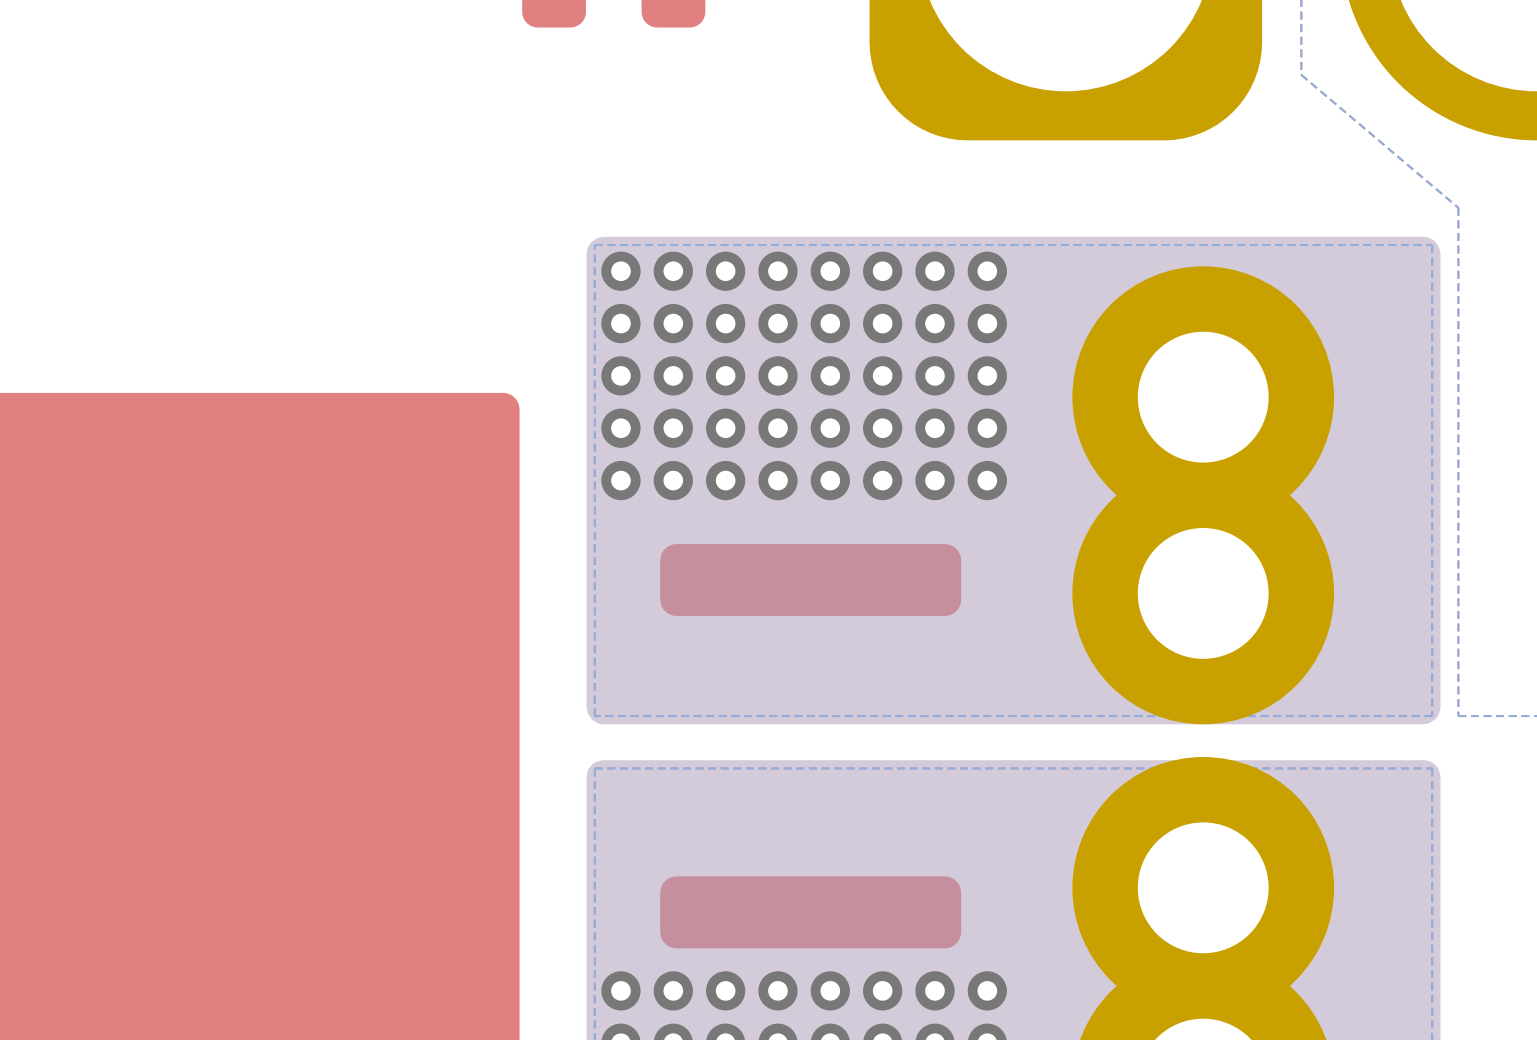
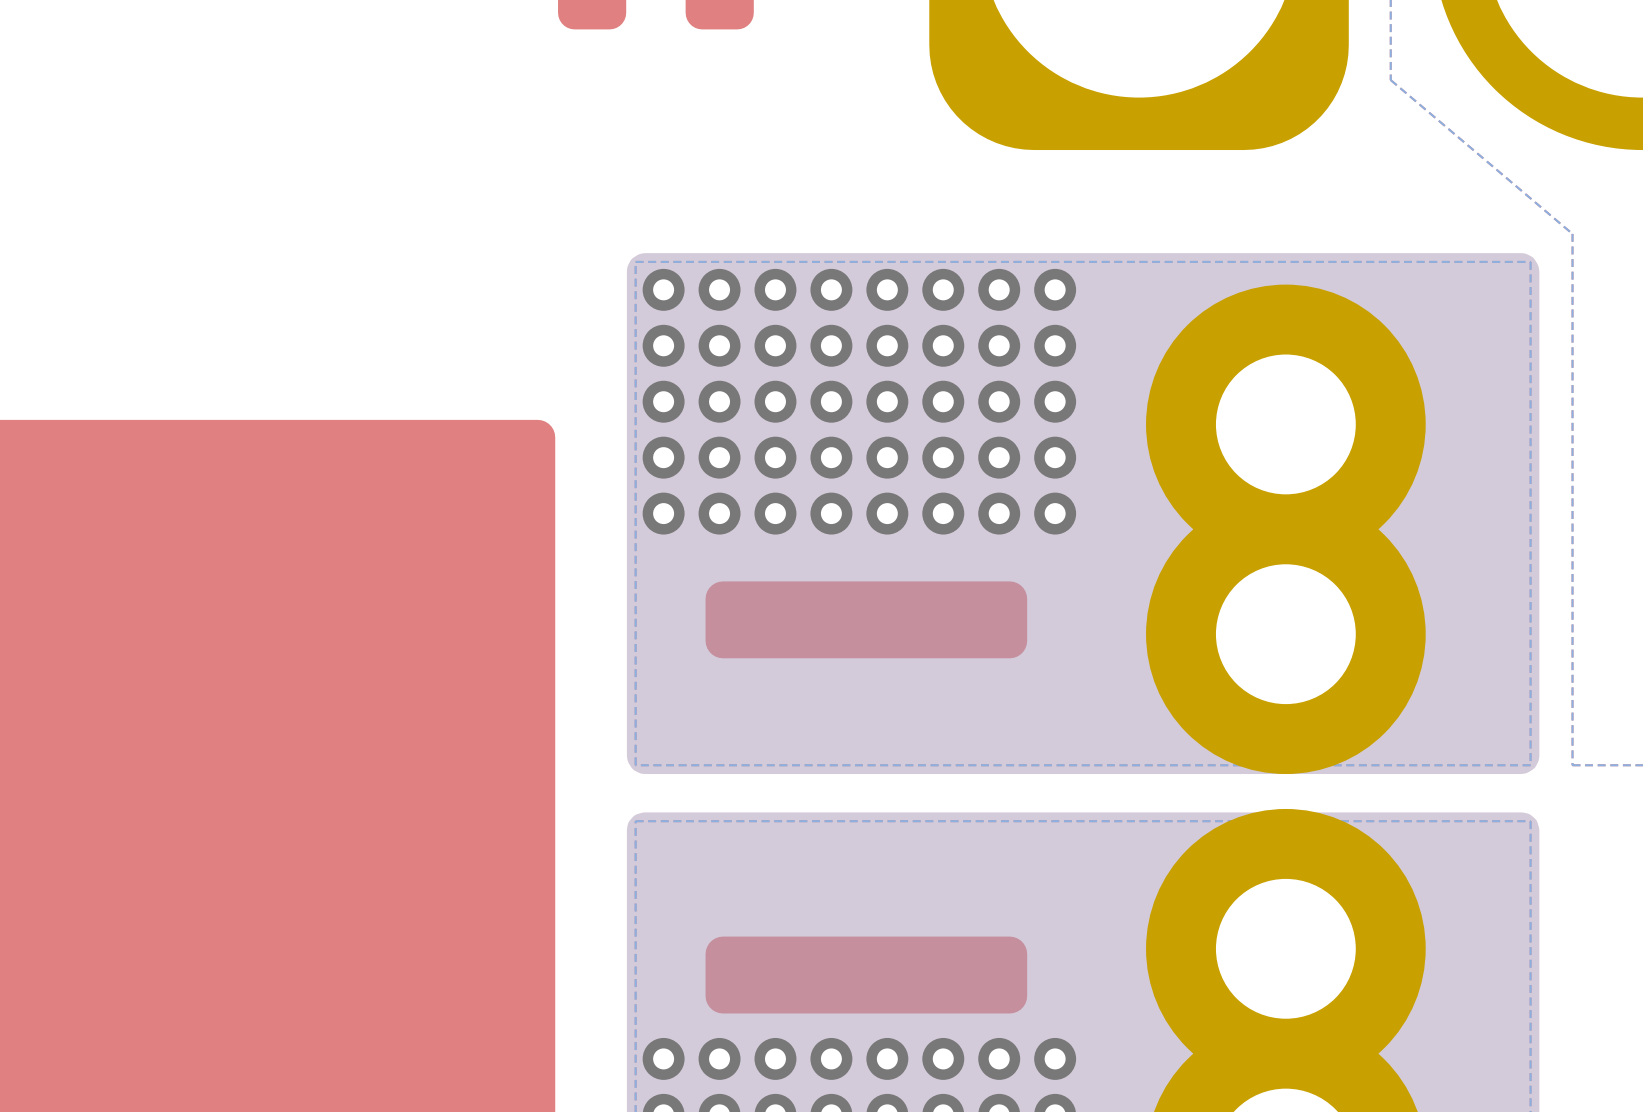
bottom zone outline: (1458, 207) (1458, 716) (1471, 716) -> (1558, 222) (1572, 233) (1572, 765)

